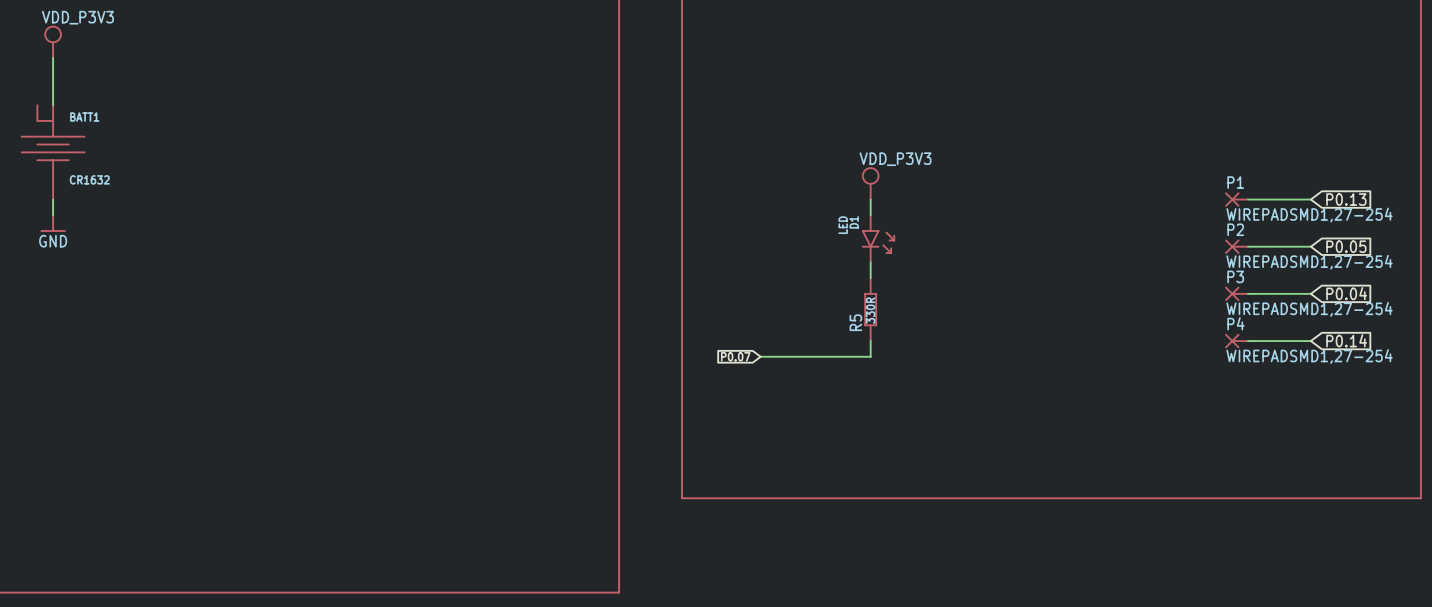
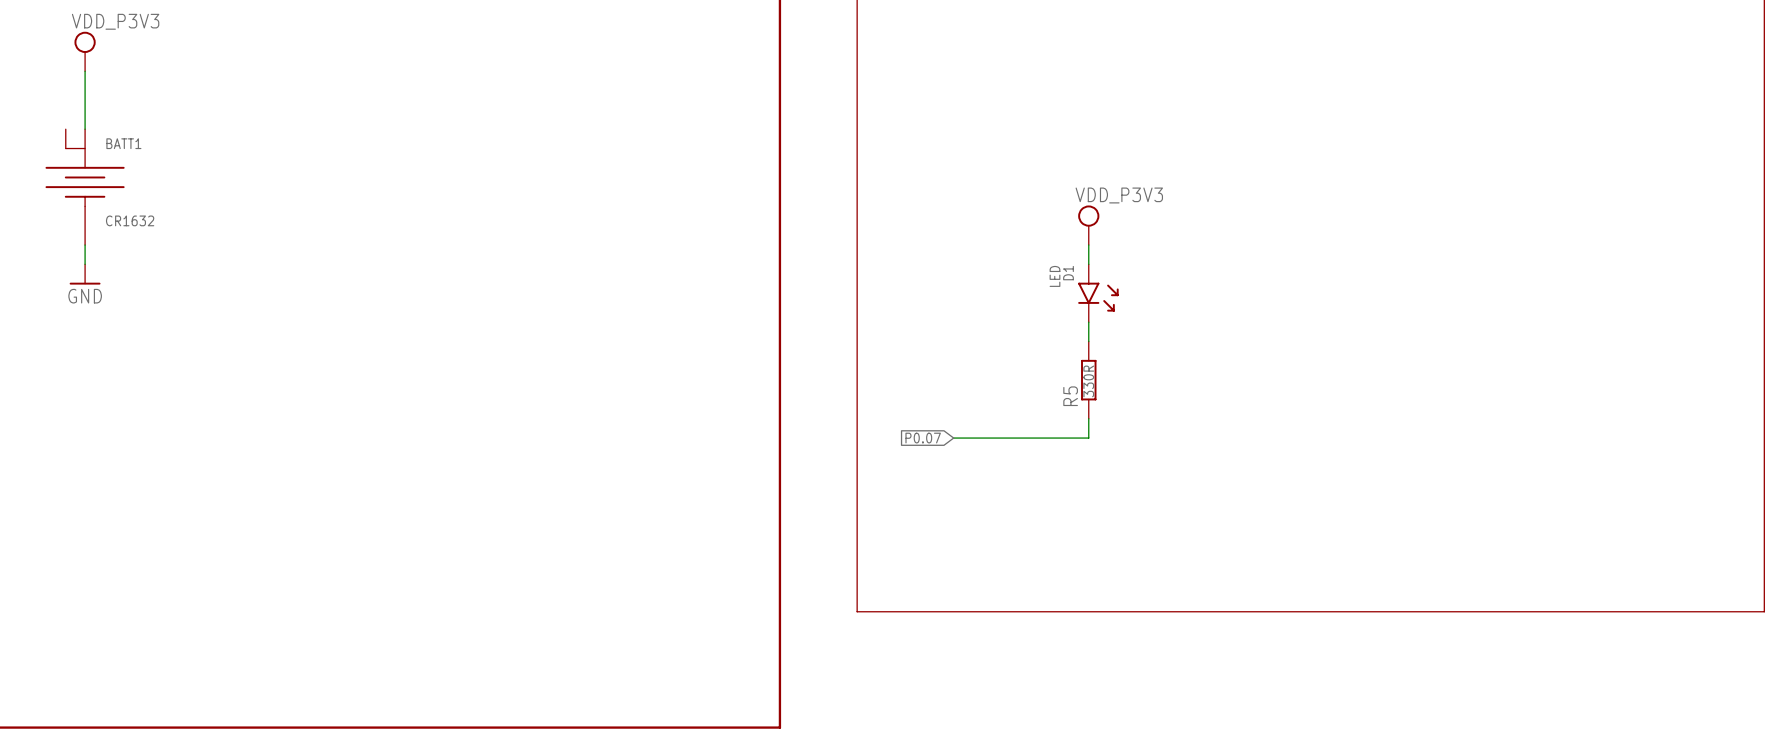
P1: WIREPADSMD1,27-254 (1236, 199) -> none
wire: (1248, 199) (1310, 199) -> none
global label: P0.13 (1346, 199) -> none
P2: WIREPADSMD1,27-254 (1236, 246) -> none
wire: (1248, 246) (1310, 246) -> none
global label: P0.05 (1346, 246) -> none
P3: WIREPADSMD1,27-254 (1236, 293) -> none
wire: (1248, 293) (1310, 293) -> none
global label: P0.04 (1346, 293) -> none
global label: P0.14 (1346, 340) -> none
P4: WIREPADSMD1,27-254 (1236, 341) -> none
wire: (1248, 341) (1310, 341) -> none

